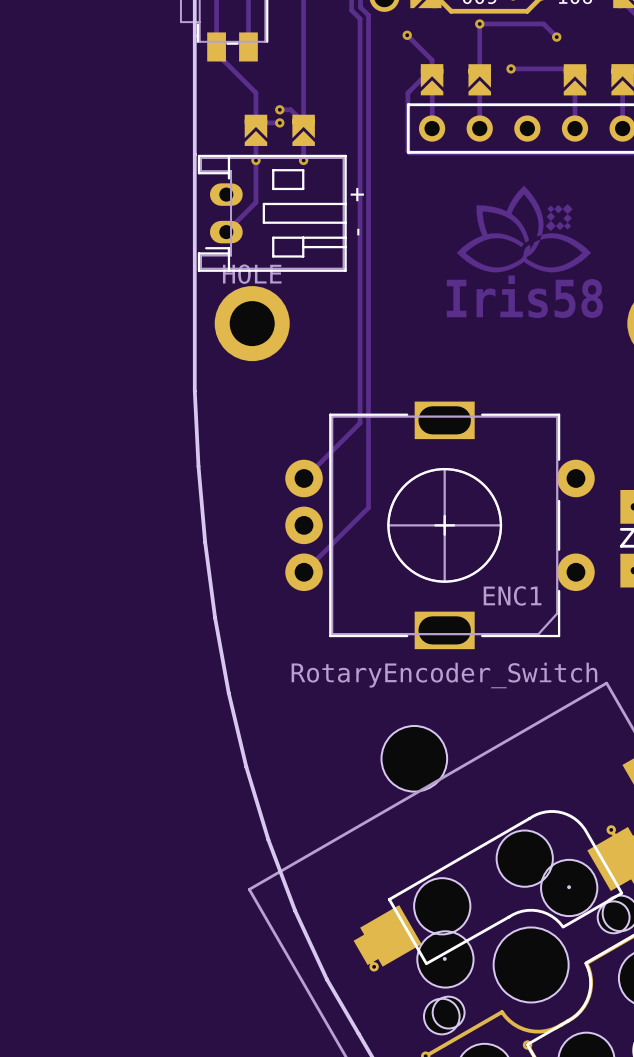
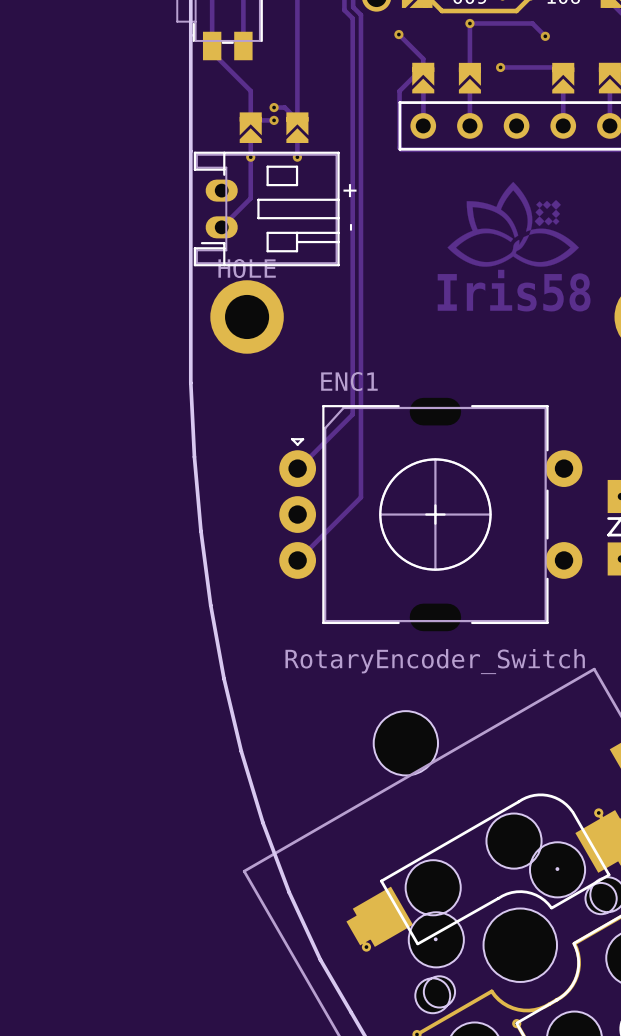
ENC1 footprint: [285, 401, 595, 650] -> [279, 397, 583, 632]
ENC1 name position: ENC1 (512, 595) -> ENC1 (349, 381)

